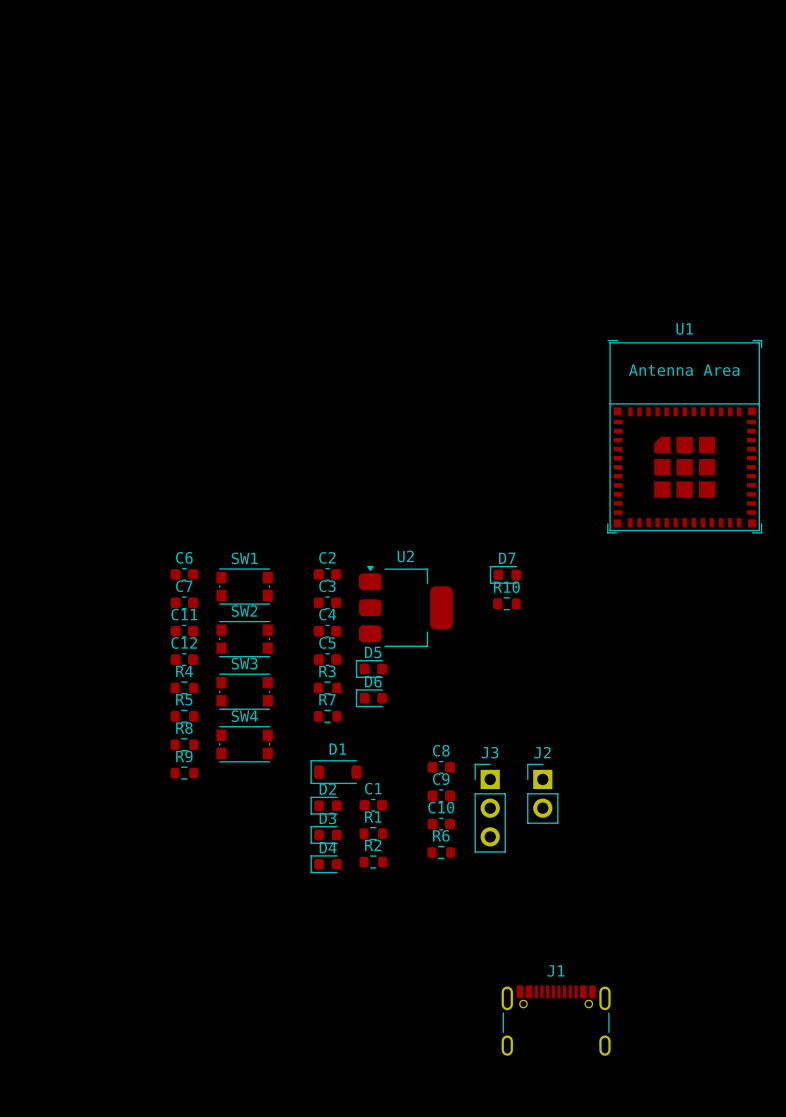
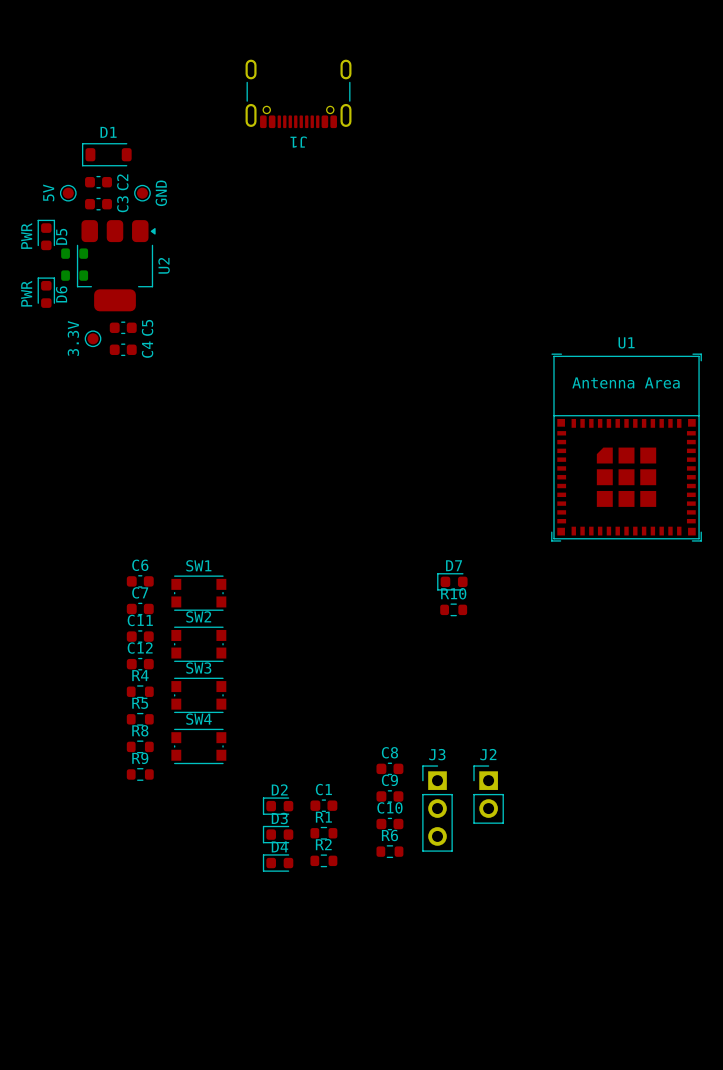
part: none -> 5V (68, 193)
part: none -> GND (142, 193)
D5 value: none -> PWR (26, 236)
part: none -> (74, 253)
part: none -> (74, 275)
D6 value: none -> PWR (26, 293)
part: none -> 3.3V (93, 338)
C2 name rotation: 0° (327, 557) -> 90° counterclockwise (122, 182)
C2 name position: C2 (327, 557) -> C2 (122, 182)
C2 position: (327, 574) -> (98, 182)
C3 name rotation: 0° (327, 586) -> 90° counterclockwise (122, 204)
C3 name position: C3 (327, 586) -> C3 (122, 204)
C3 position: (327, 602) -> (98, 204)
U2 rotation: 0° (405, 606) -> 90° clockwise (116, 265)
U2 position: (405, 606) -> (116, 265)
C4 name rotation: 0° (327, 614) -> 90° counterclockwise (147, 349)
C4 name position: C4 (327, 614) -> C4 (147, 349)
C4 position: (327, 631) -> (123, 349)
C5 name rotation: 0° (327, 642) -> 90° counterclockwise (147, 327)
C5 name position: C5 (327, 642) -> C5 (147, 327)
C5 position: (327, 659) -> (123, 327)
D5 rotation: 0° (371, 668) -> 90° clockwise (46, 234)
D5 position: (371, 668) -> (46, 234)
R3: (327, 687) -> none
D6 rotation: 0° (371, 698) -> 90° clockwise (46, 292)
D6 position: (371, 698) -> (46, 292)
R7: (327, 716) -> none
D1 position: (336, 772) -> (106, 154)
J1 rotation: 0° (556, 1020) -> 180° (298, 93)
J1 position: (556, 1020) -> (298, 93)

